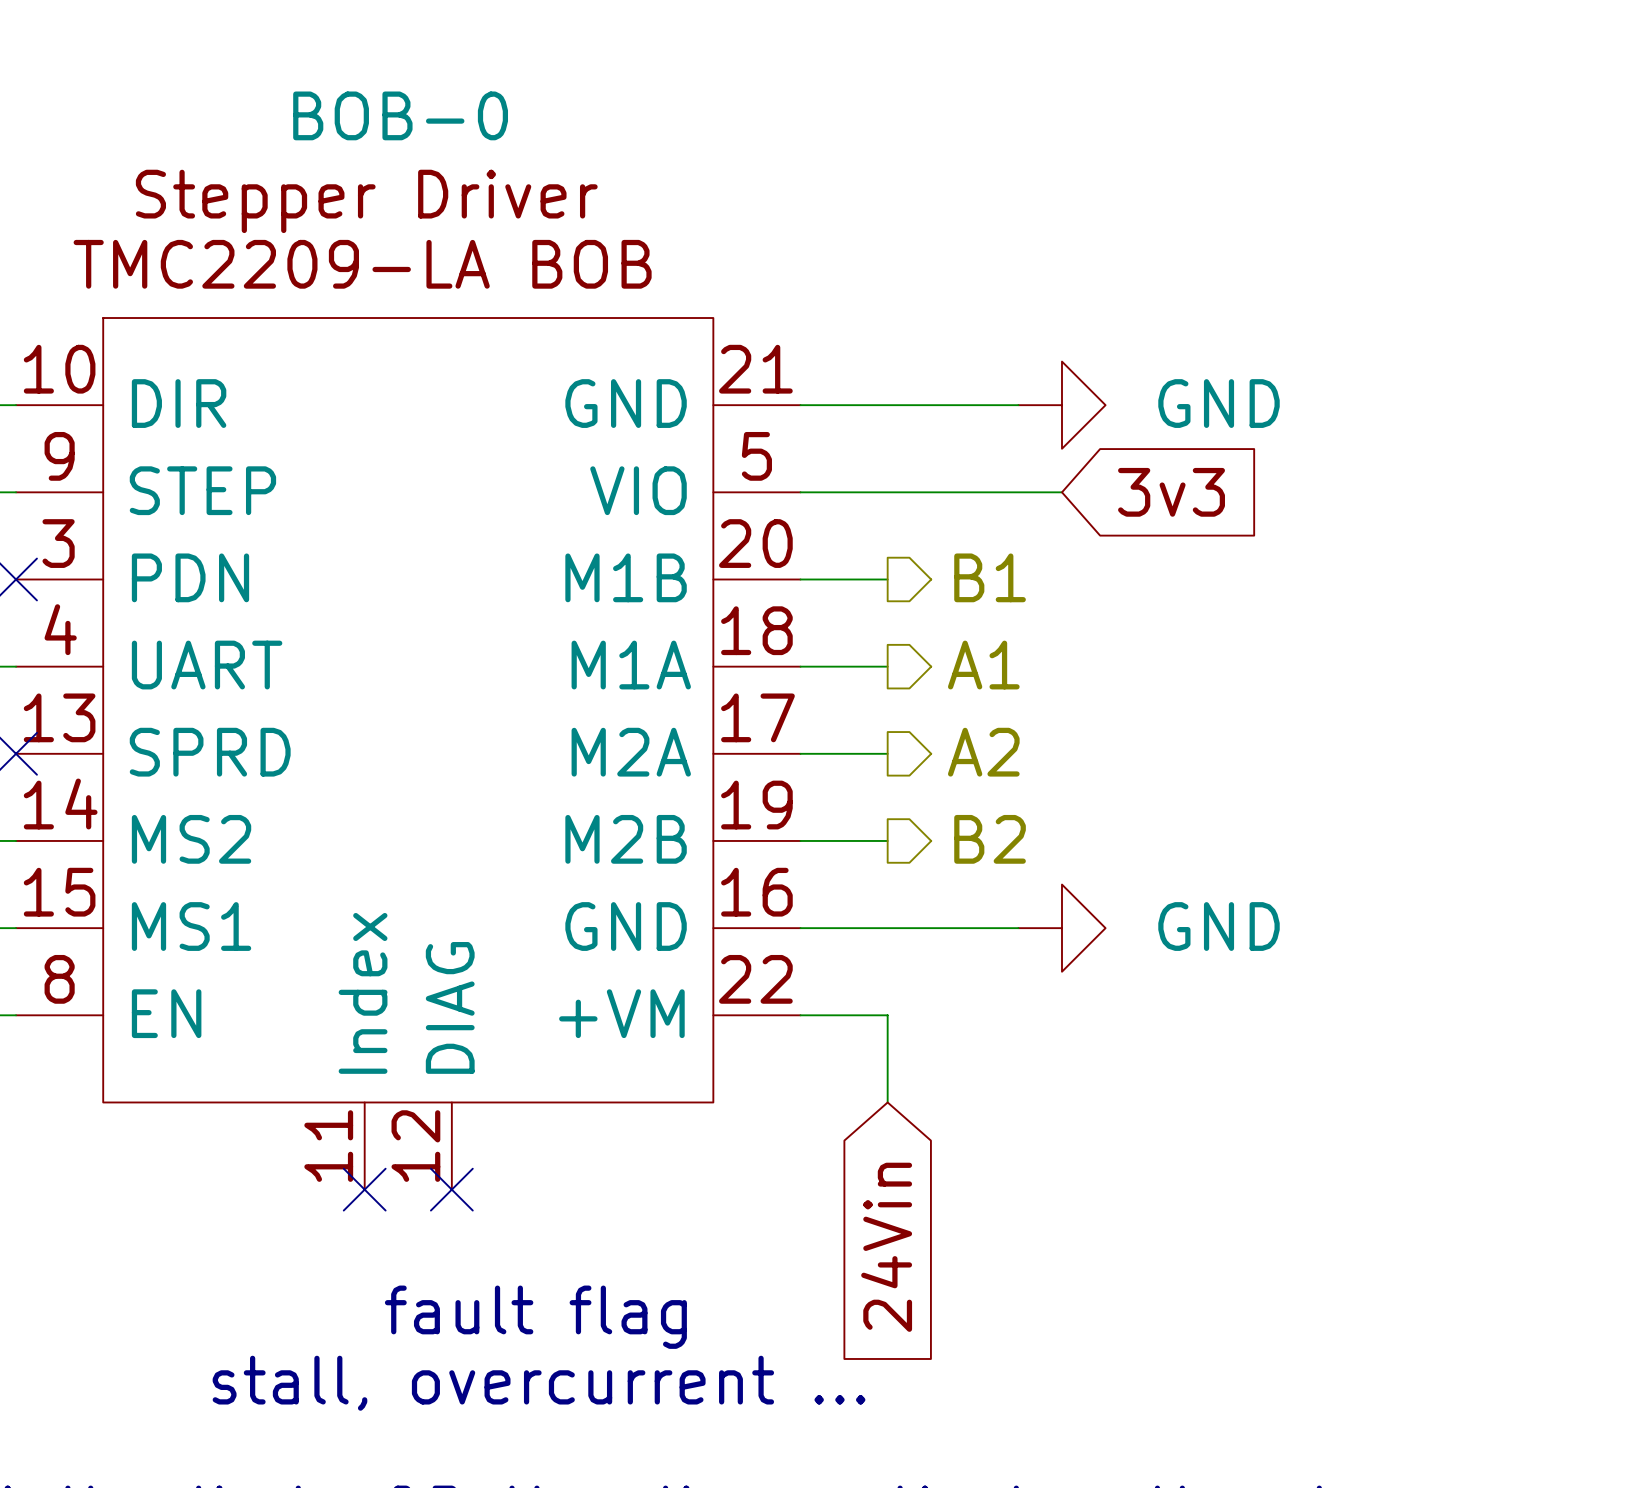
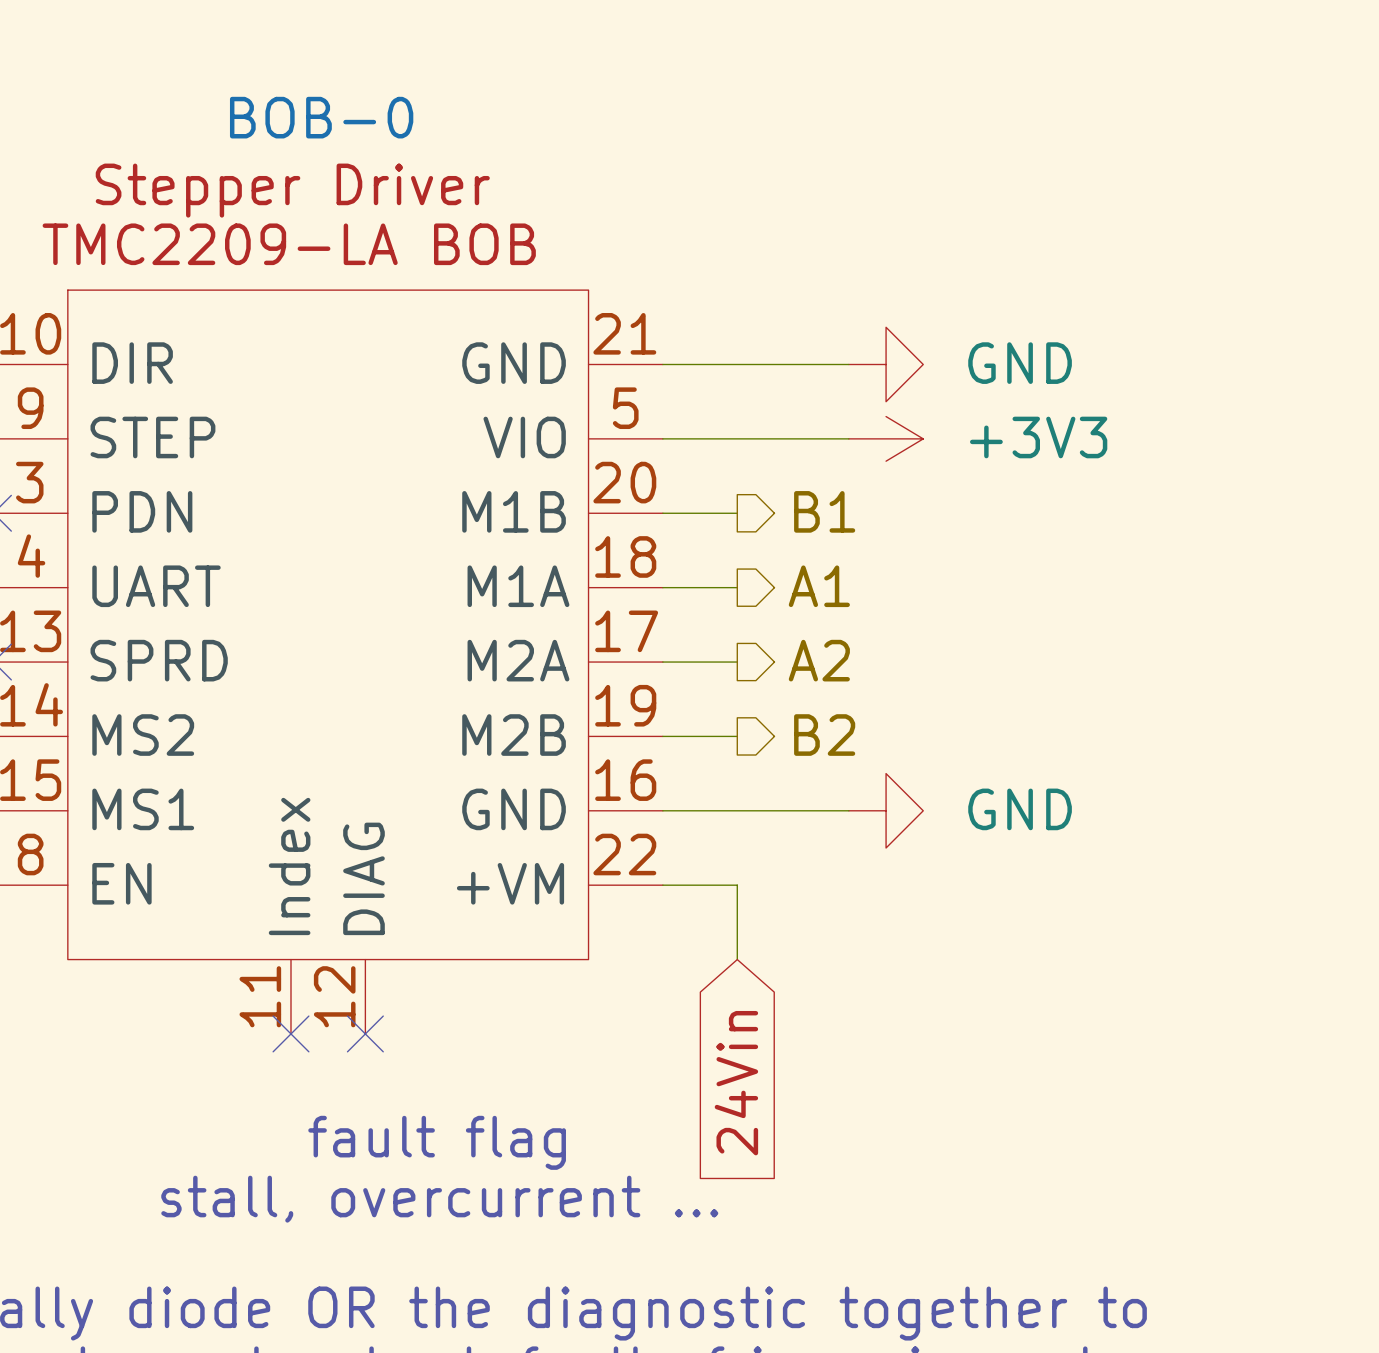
power symbol: none -> +3V3 (886, 438)
global label: 3v3 (1171, 492) -> none

